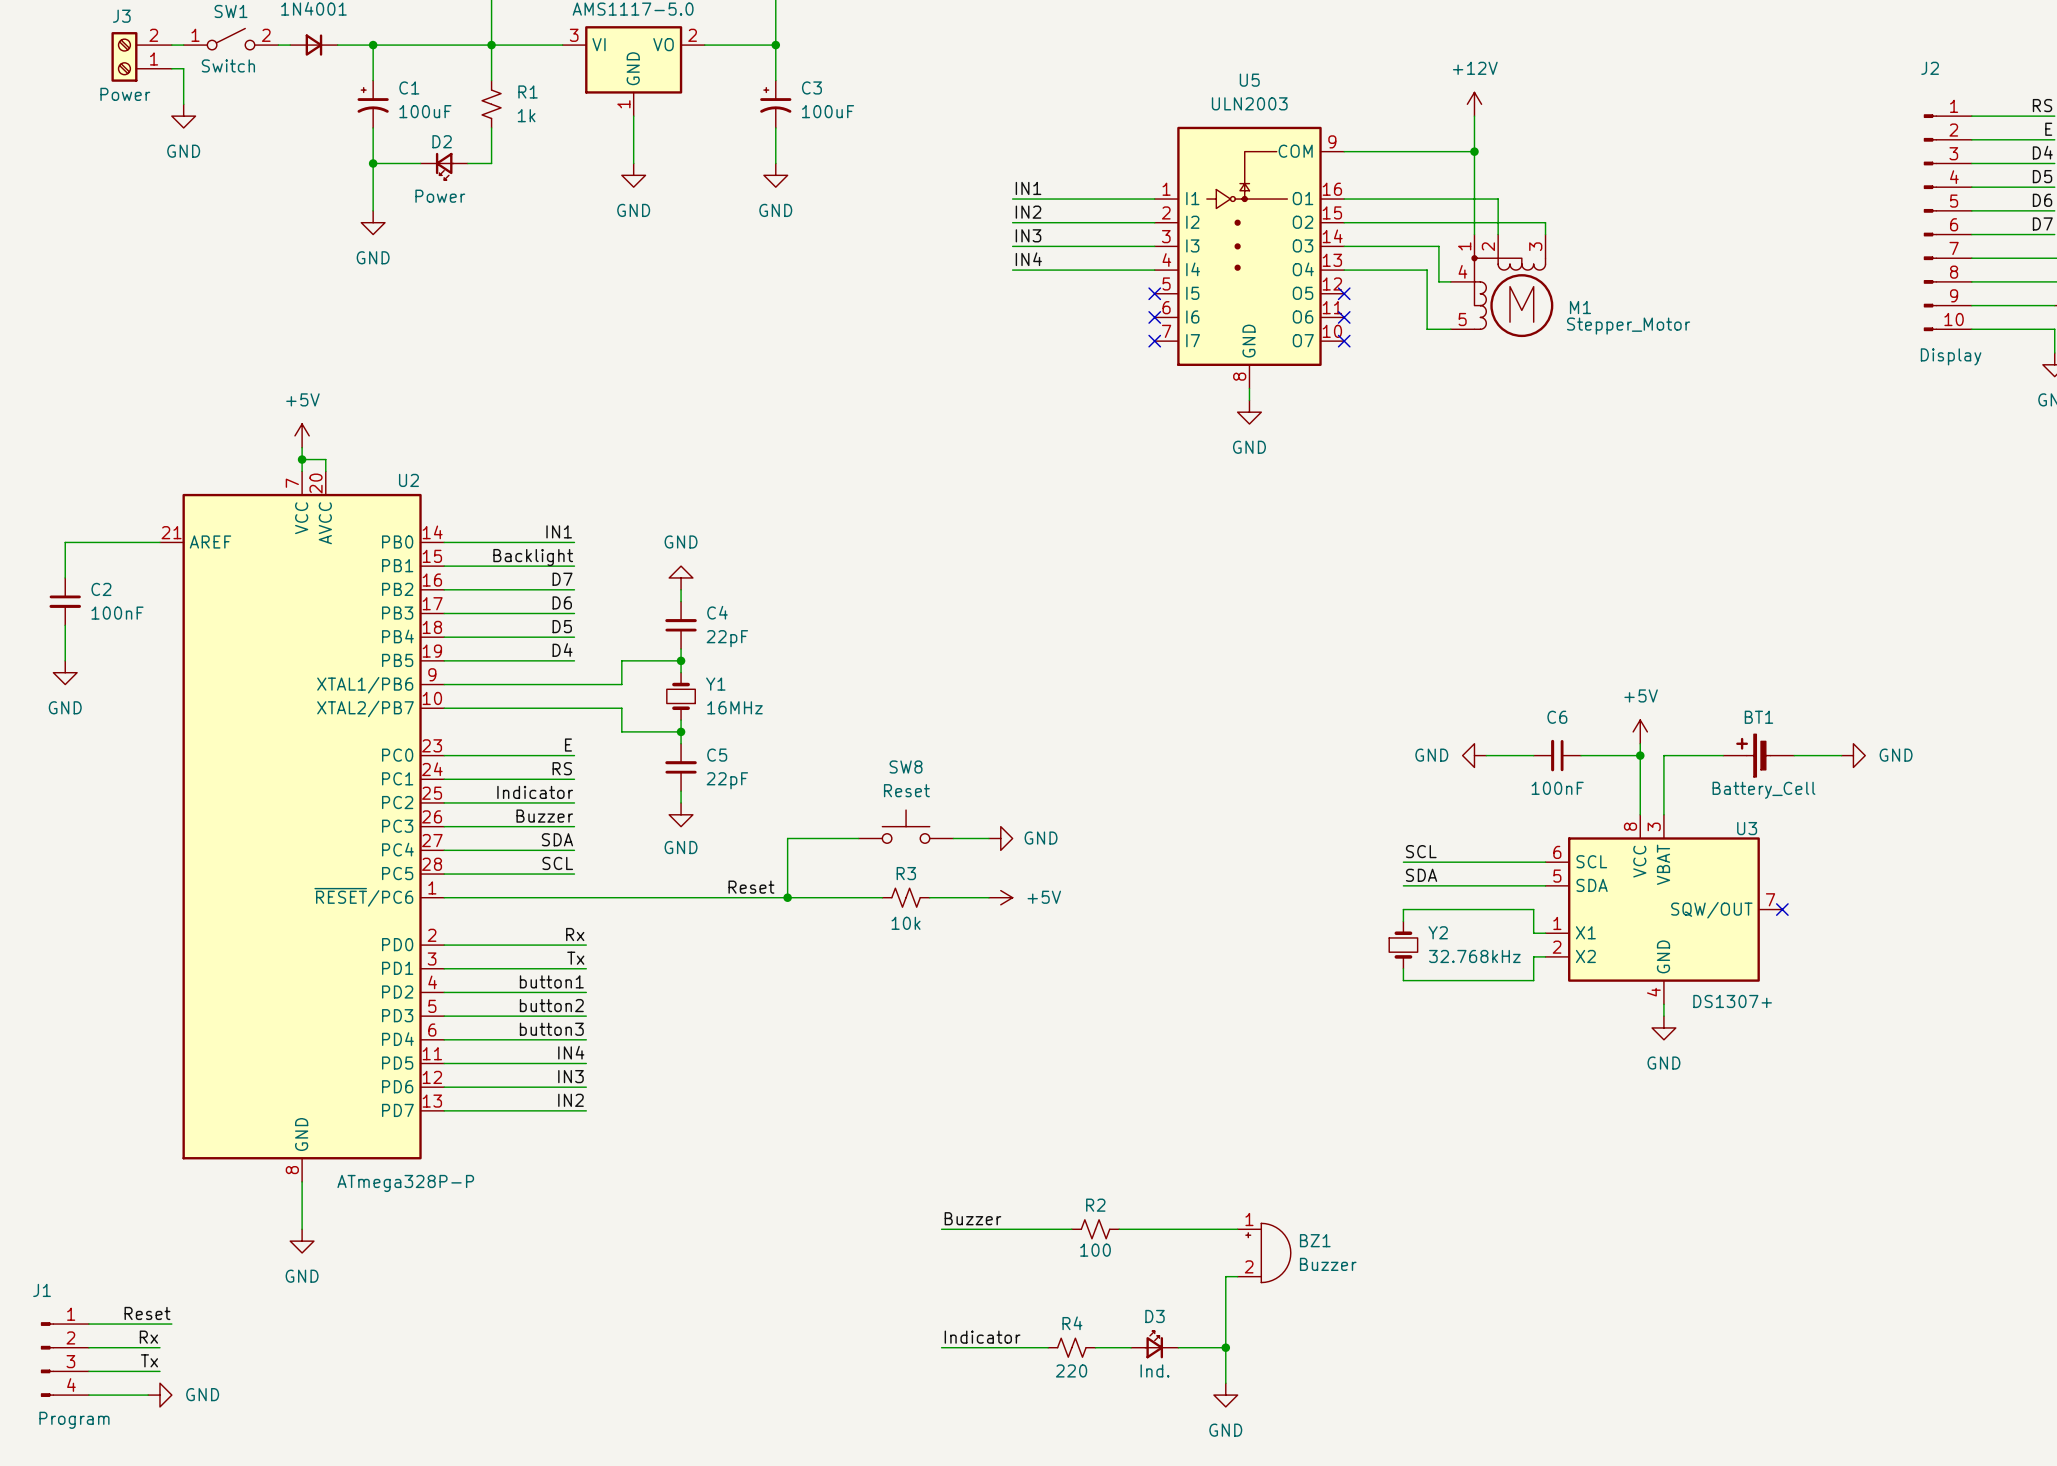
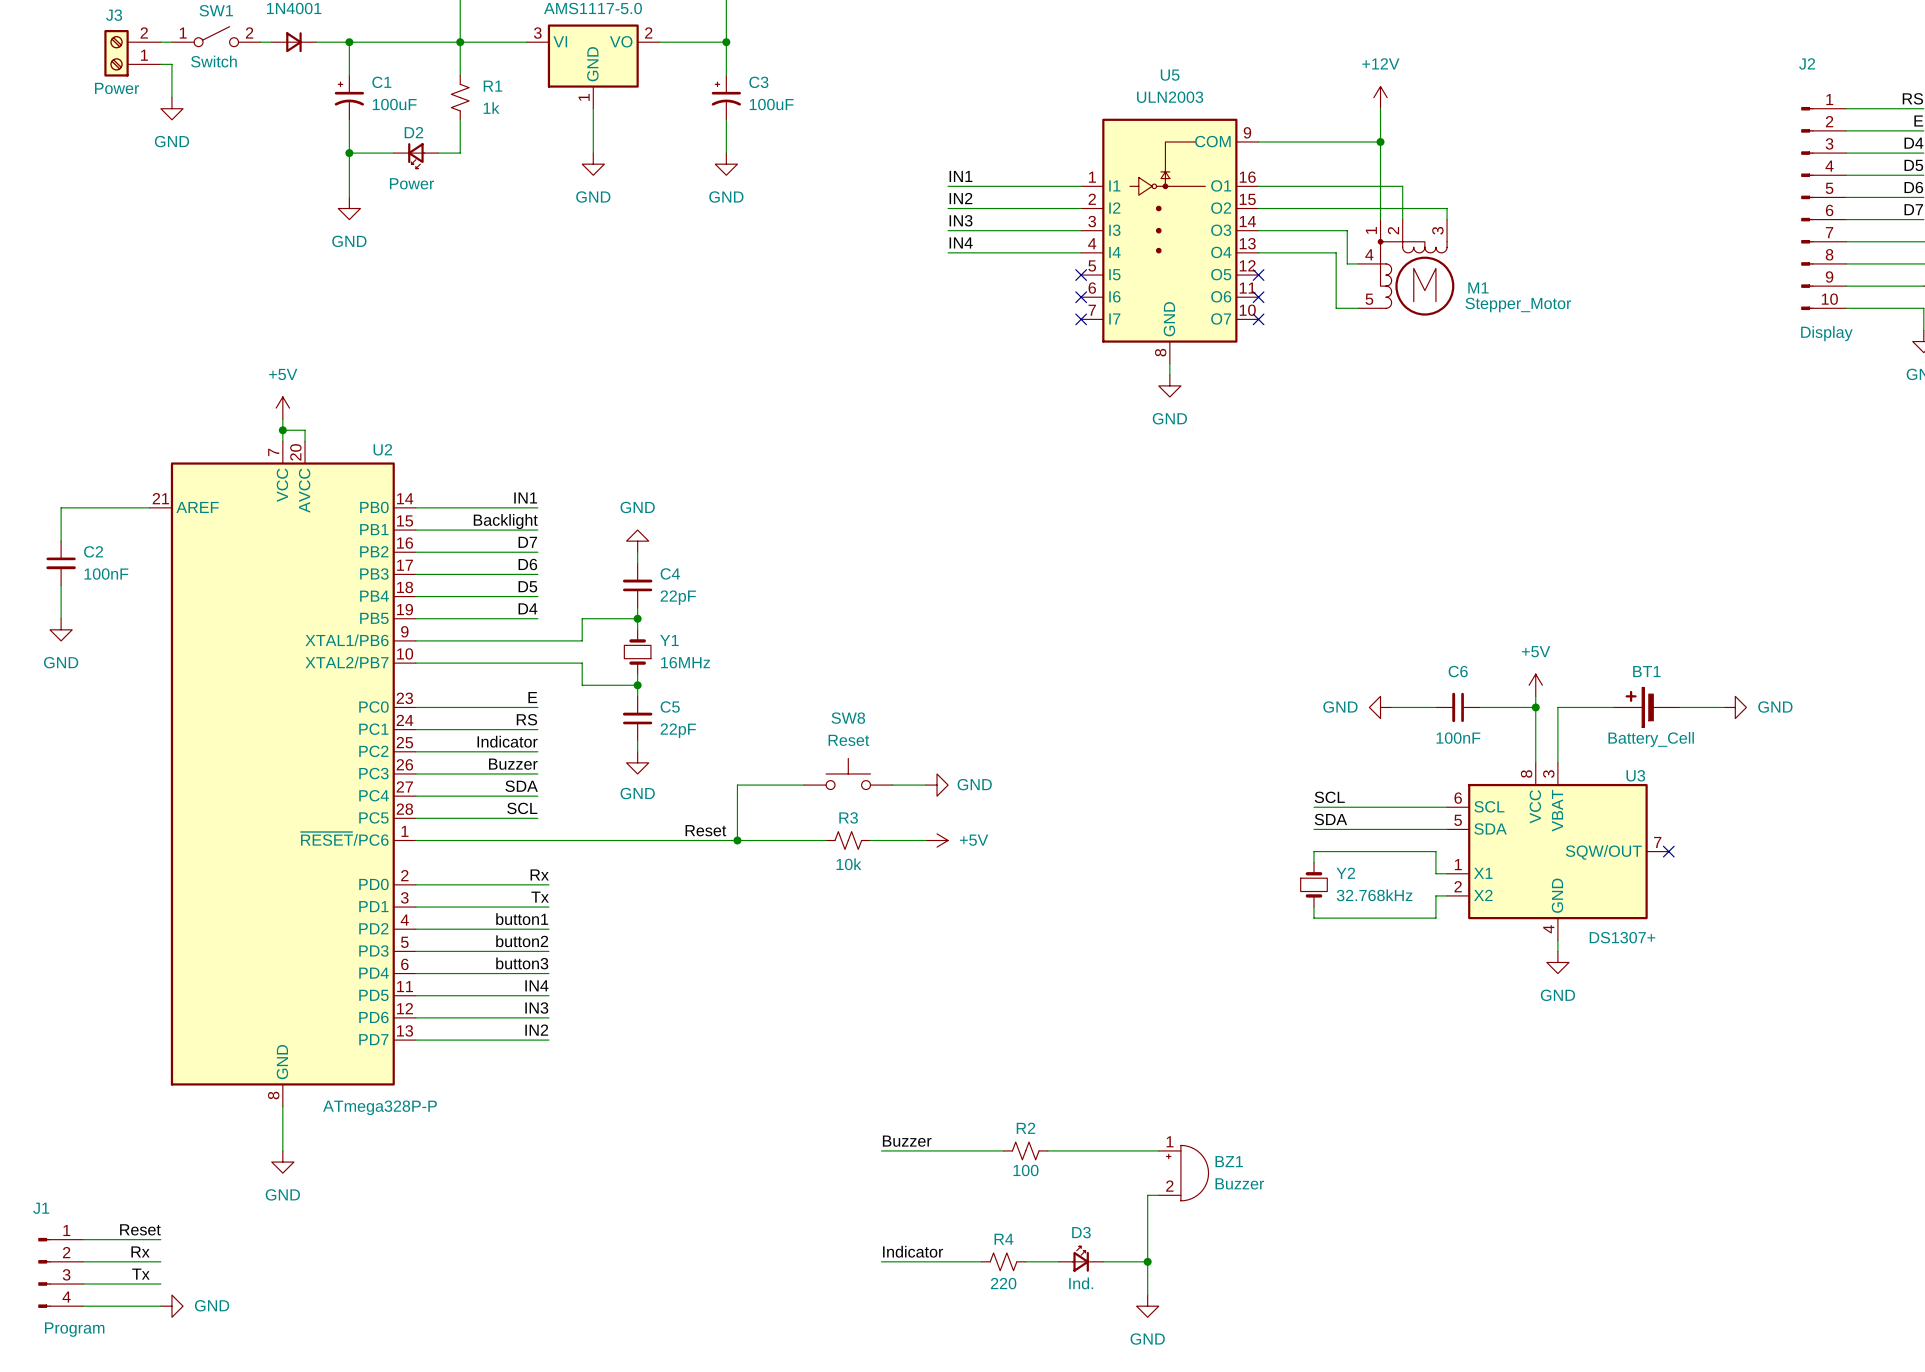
wire: none -> (149, 1261) (160, 1261)
wire: none -> (149, 1284) (160, 1284)
power symbol position: GND (159, 1395) -> GND (171, 1306)

